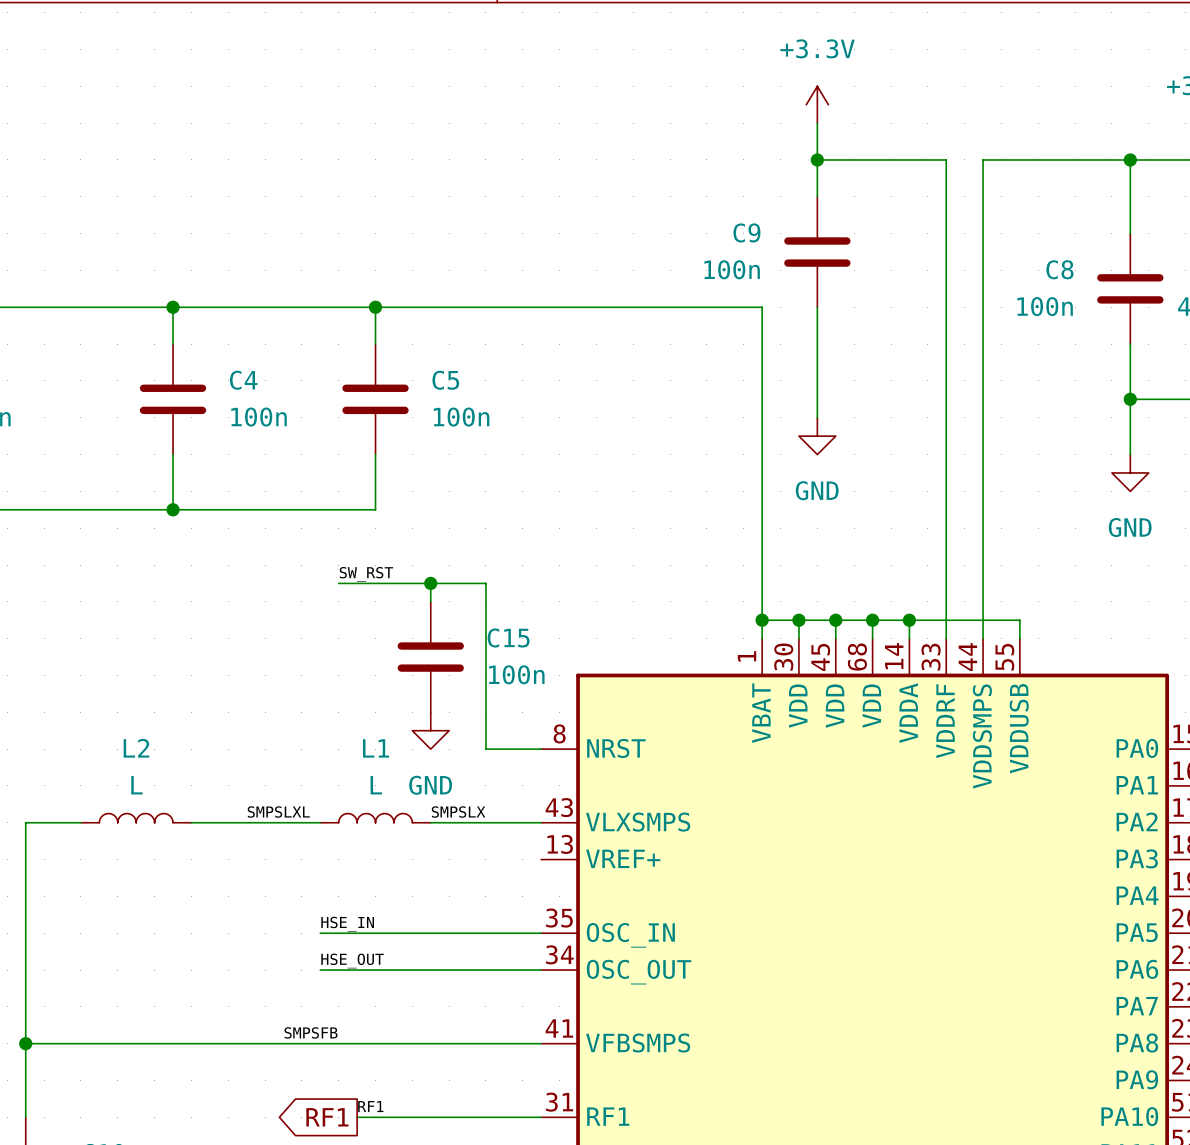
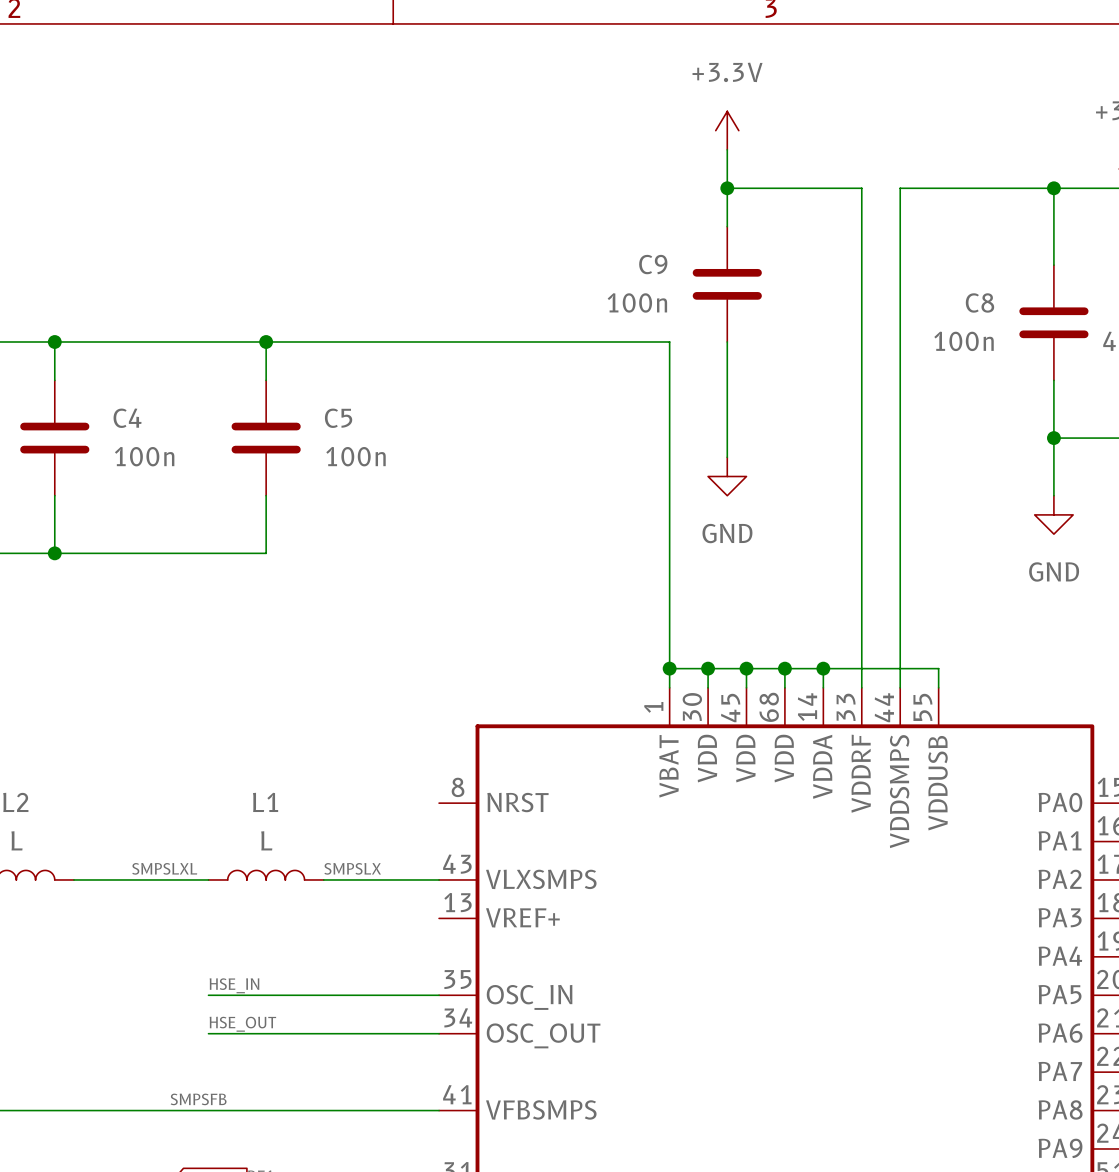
label: SW_RST (366, 574) -> none
wire: (338, 583) (485, 583) (485, 749) (541, 749) -> none
wire: (430, 583) (430, 601) -> none
junction: (430, 583) -> none
C15: 100n (430, 657) -> none
power symbol: GND (430, 730) -> none

